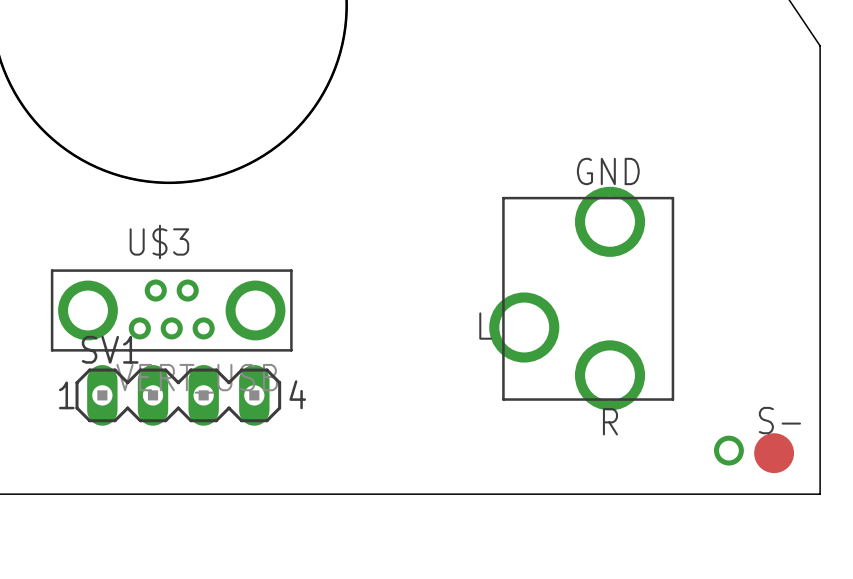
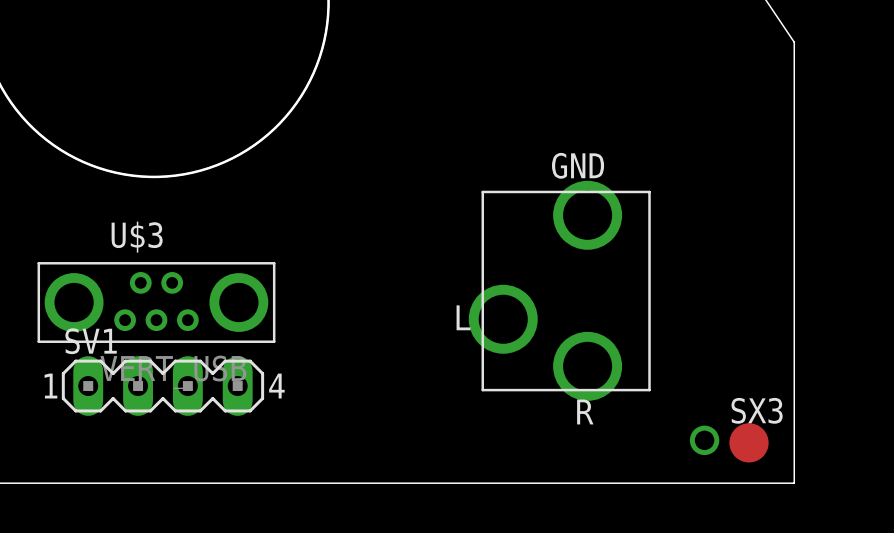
S- name: S- (779, 420) -> SX3 (757, 410)

